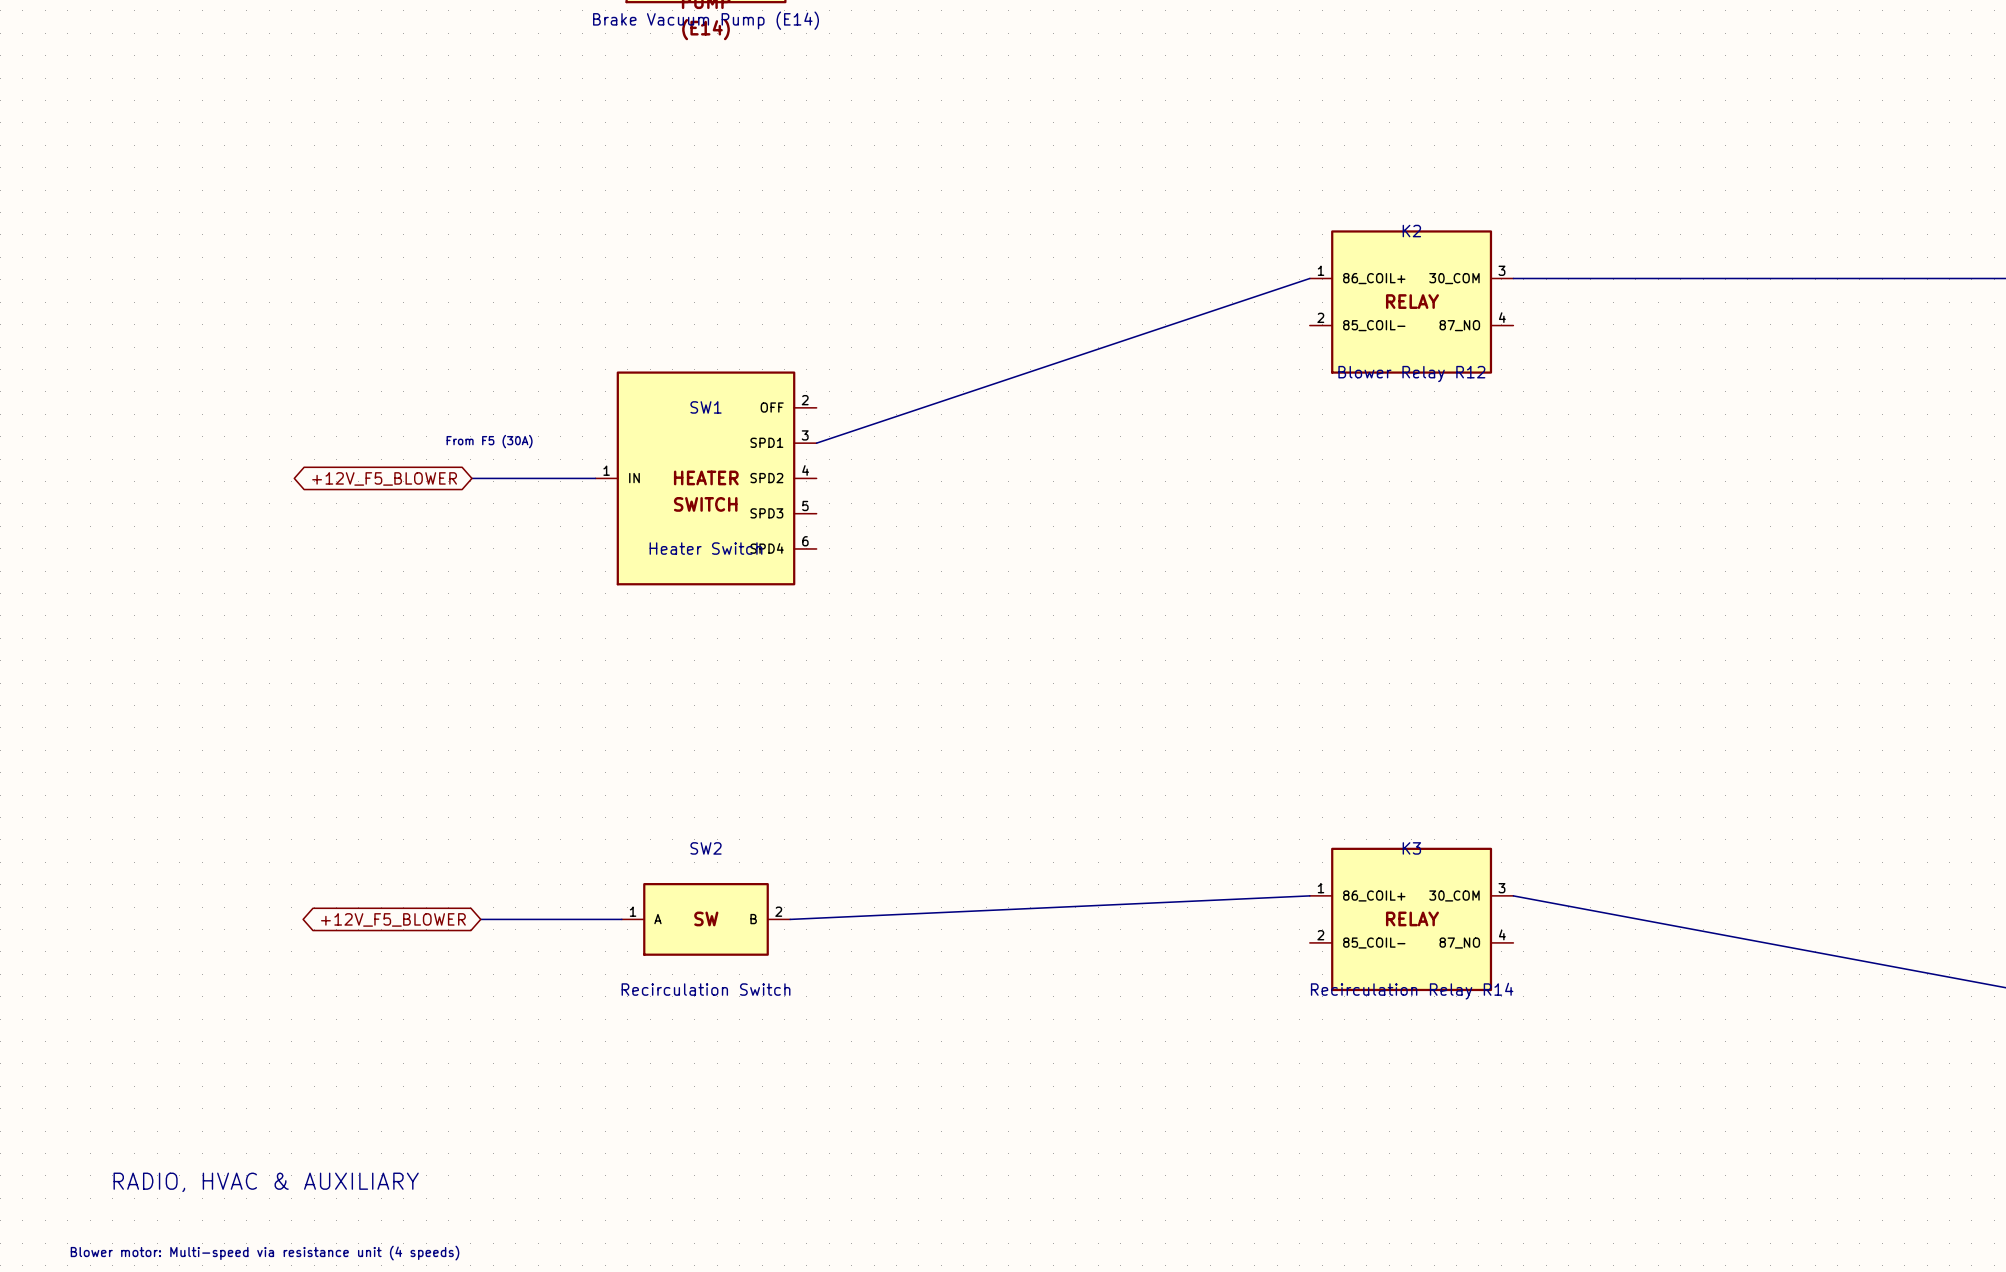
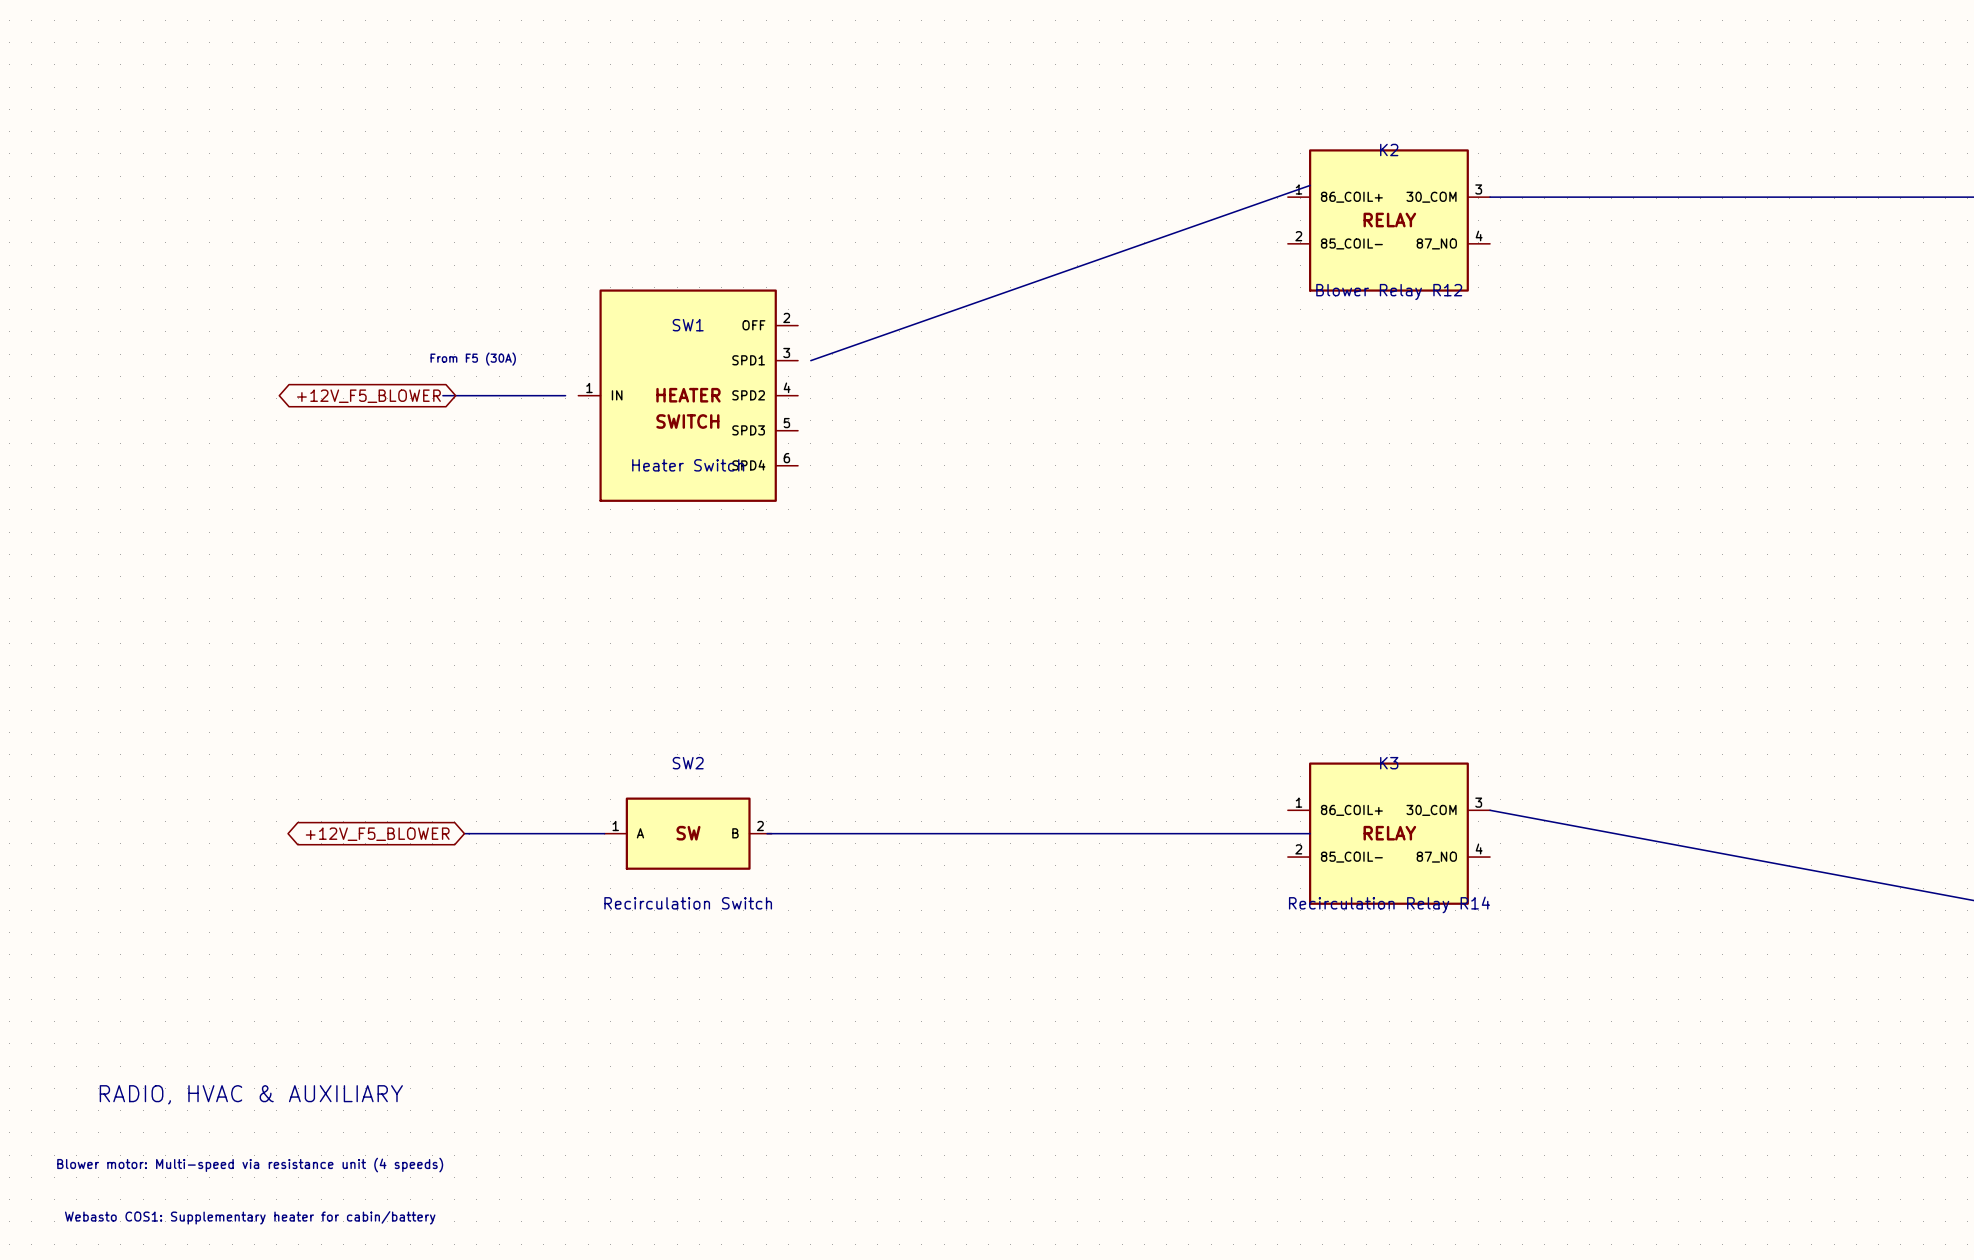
wire: none -> (1310, 185) (810, 360)
wire: (1309, 278) (816, 443) -> none
wire: (582, 478) (595, 478) -> (442, 395) (455, 395)
wire: (1309, 895) (790, 919) -> none
wire: none -> (767, 833) (1310, 833)

